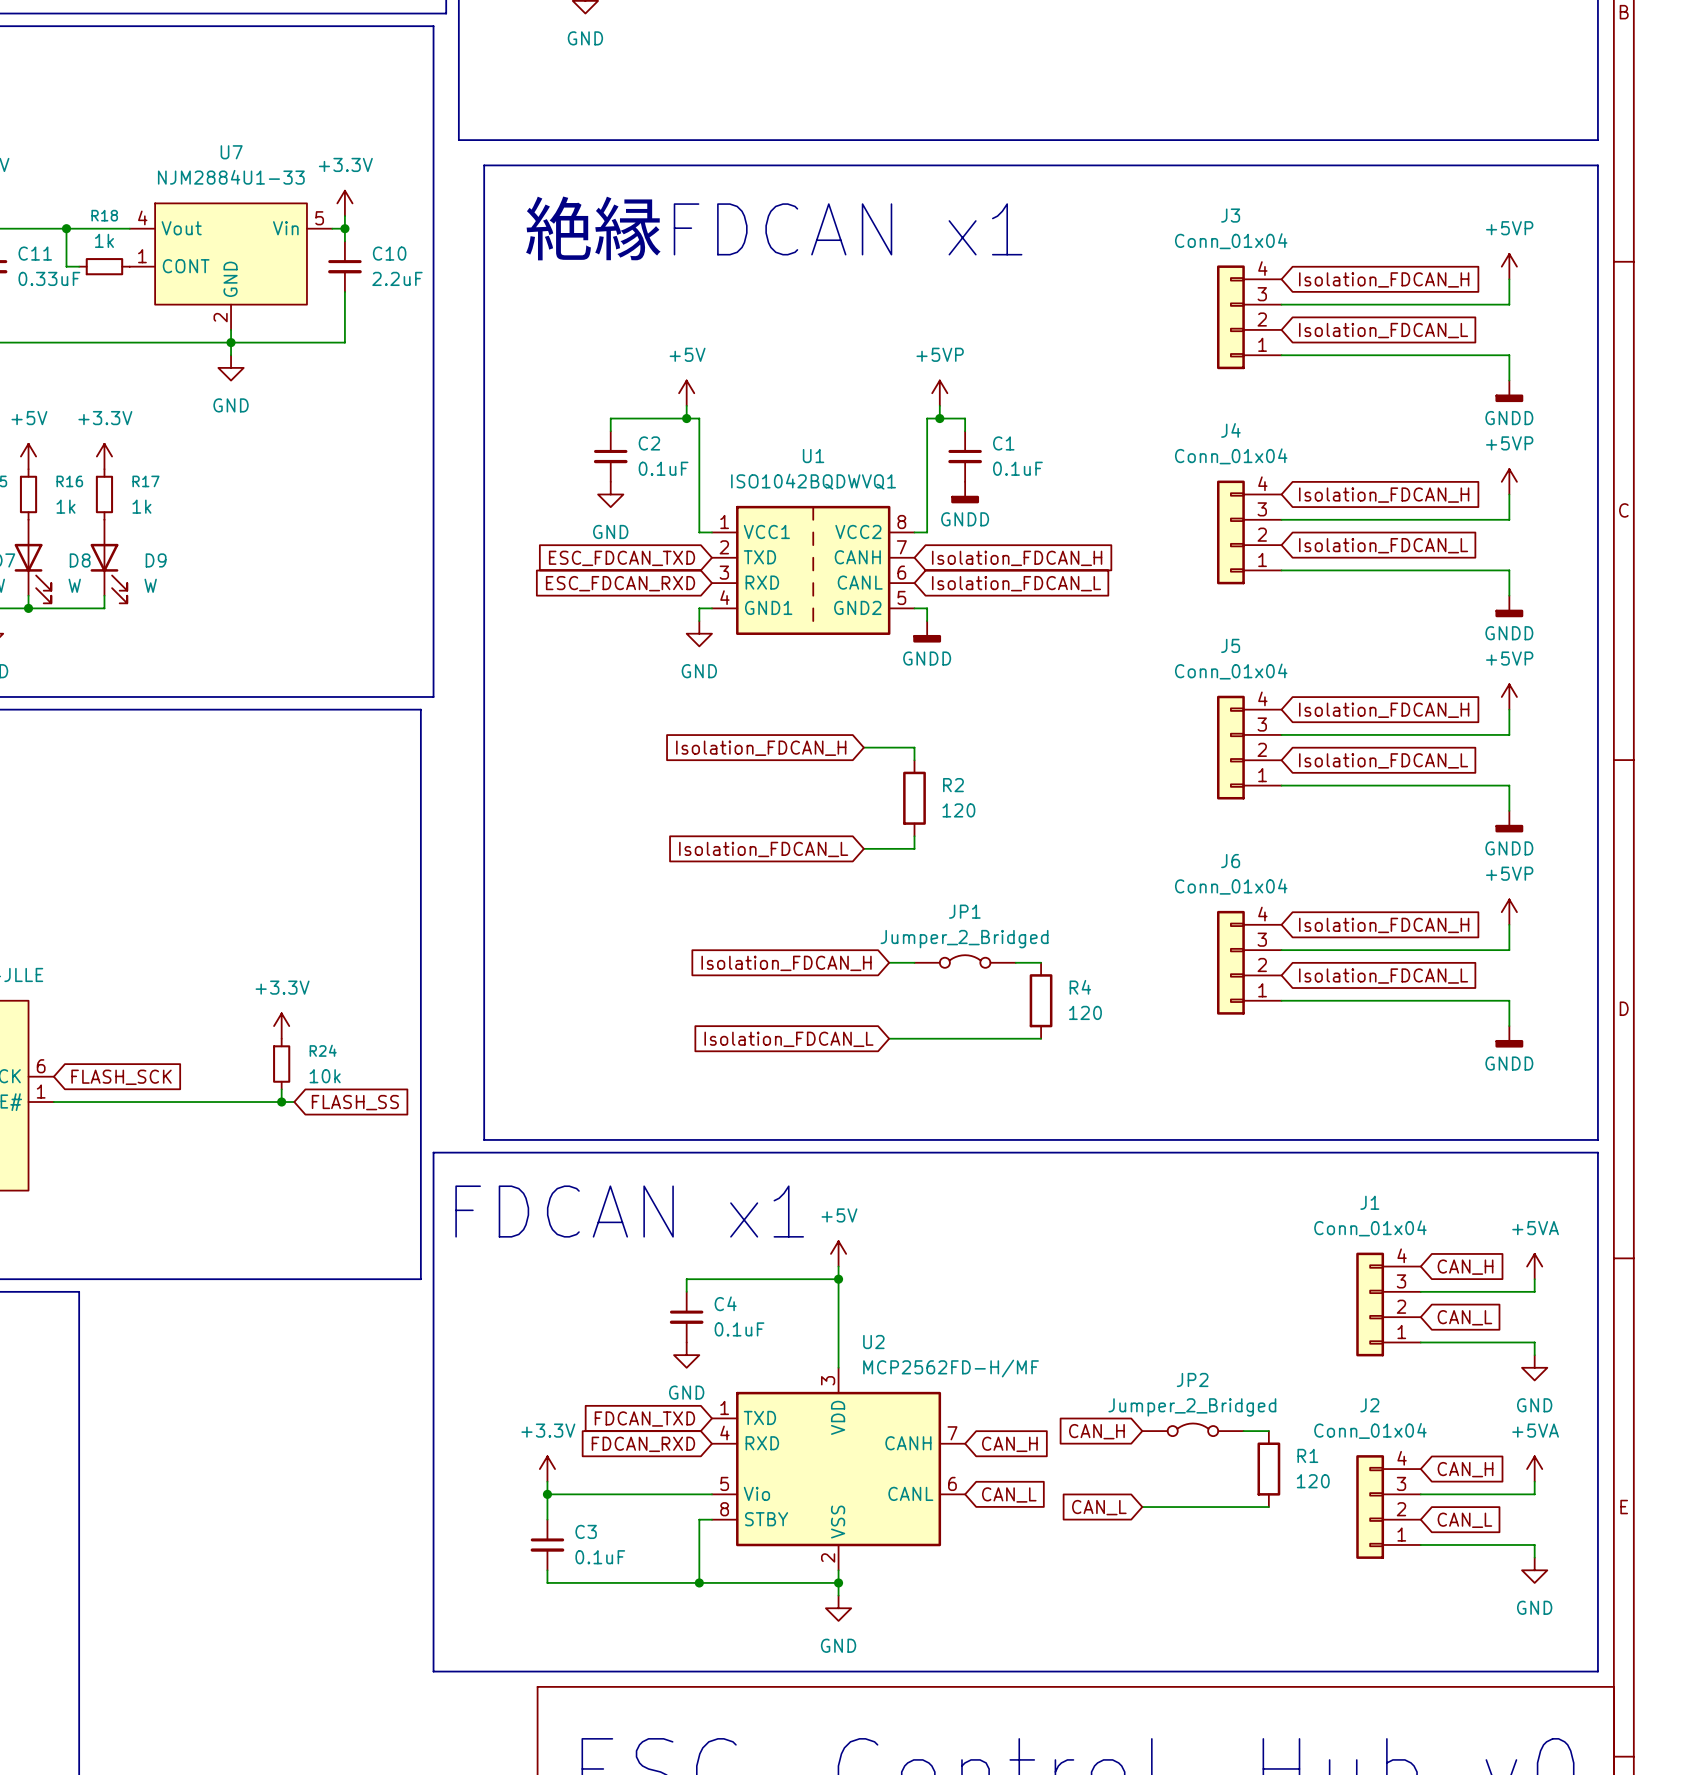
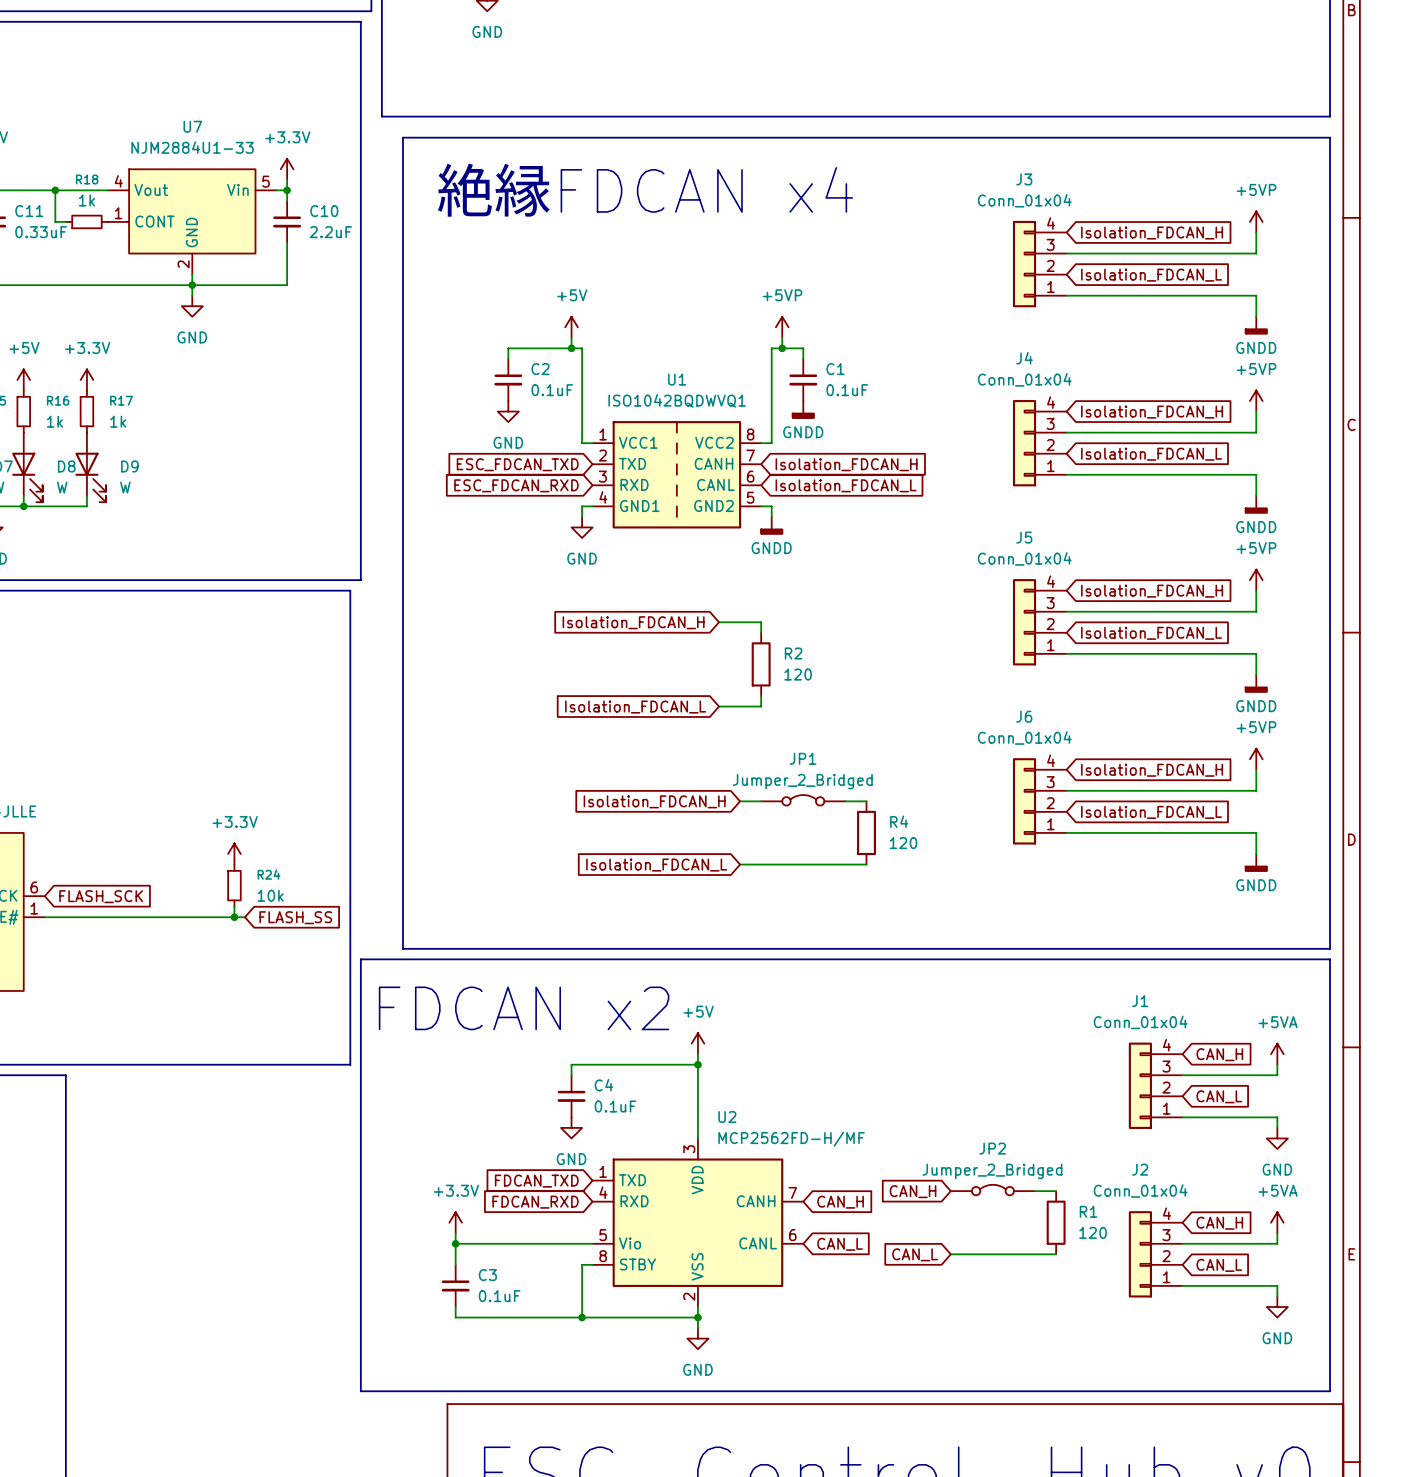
text: 絶縁FDCAN x1 (773, 228) -> 絶縁FDCAN x4 (645, 190)
text: FDCAN x1 (629, 1211) -> FDCAN x2 (524, 1008)

